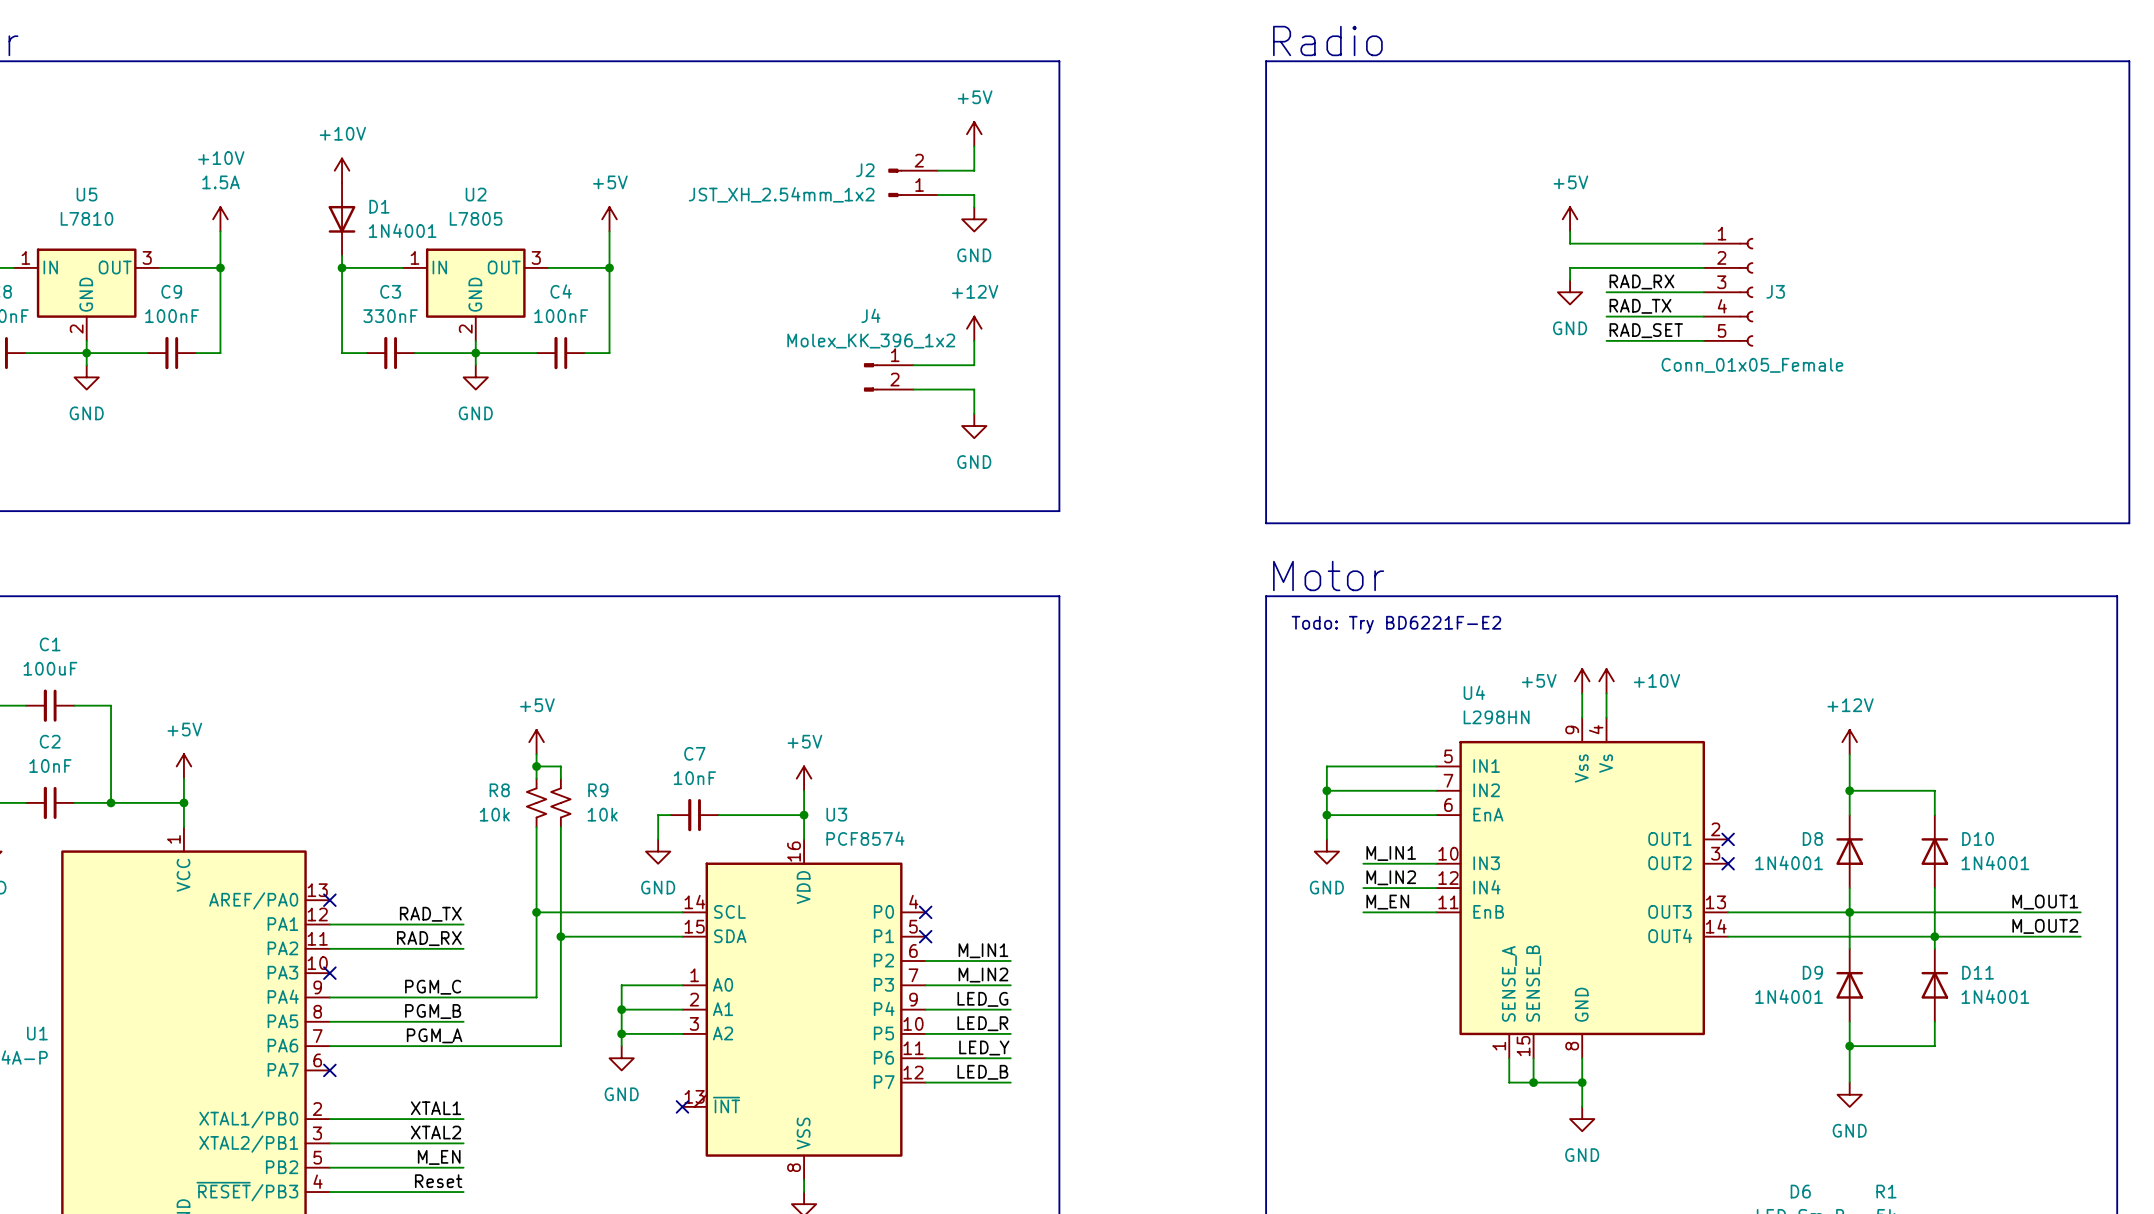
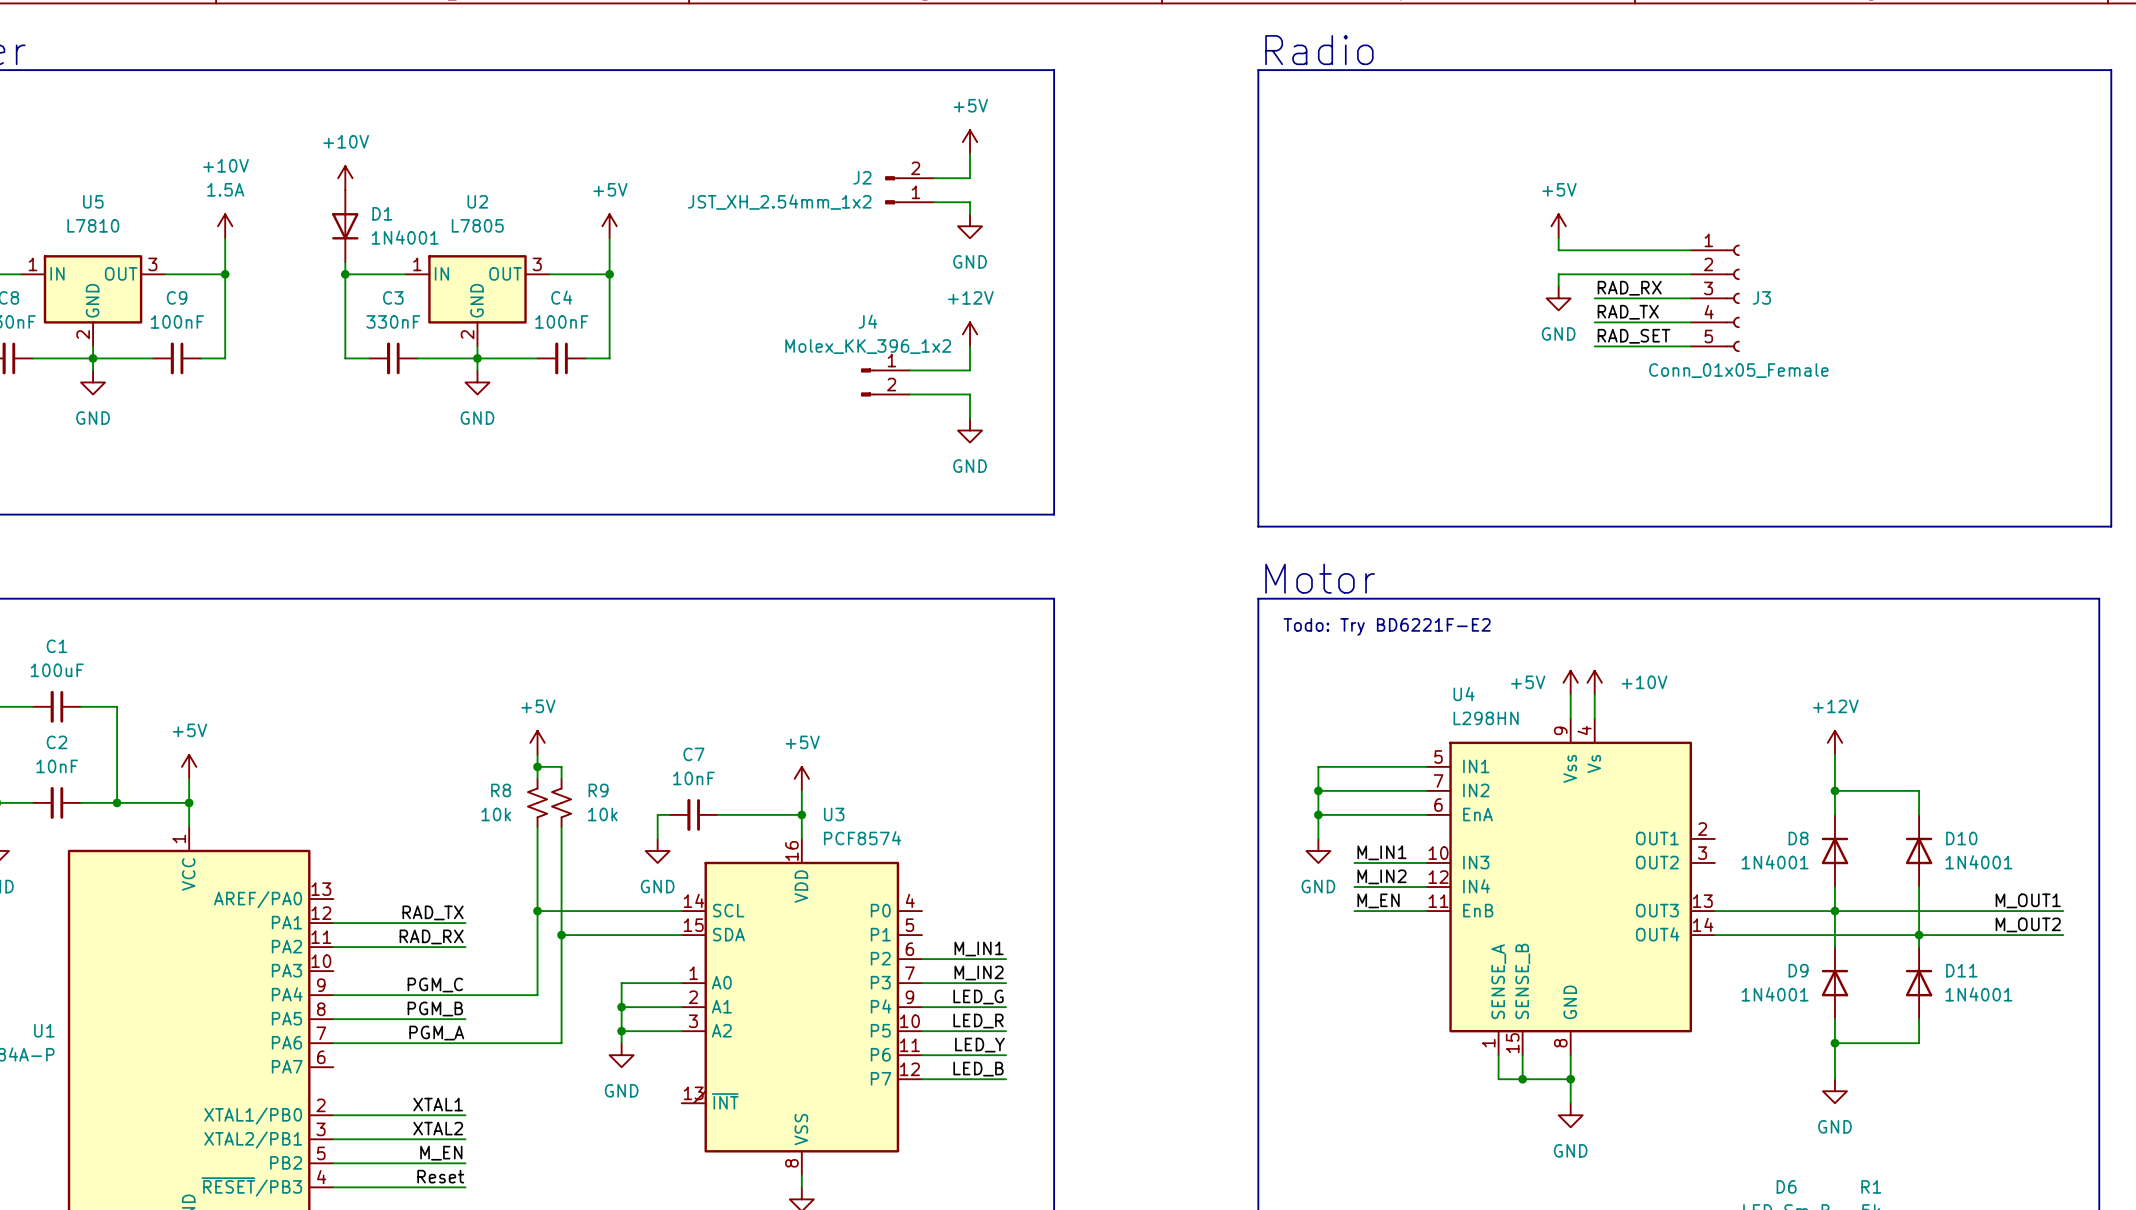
no-connect mark: (1728, 839) -> none
no-connect mark: (1728, 863) -> none
no-connect mark: (329, 900) -> none
no-connect mark: (925, 912) -> none
no-connect mark: (925, 936) -> none
no-connect mark: (329, 973) -> none
no-connect mark: (329, 1070) -> none
no-connect mark: (682, 1106) -> none

